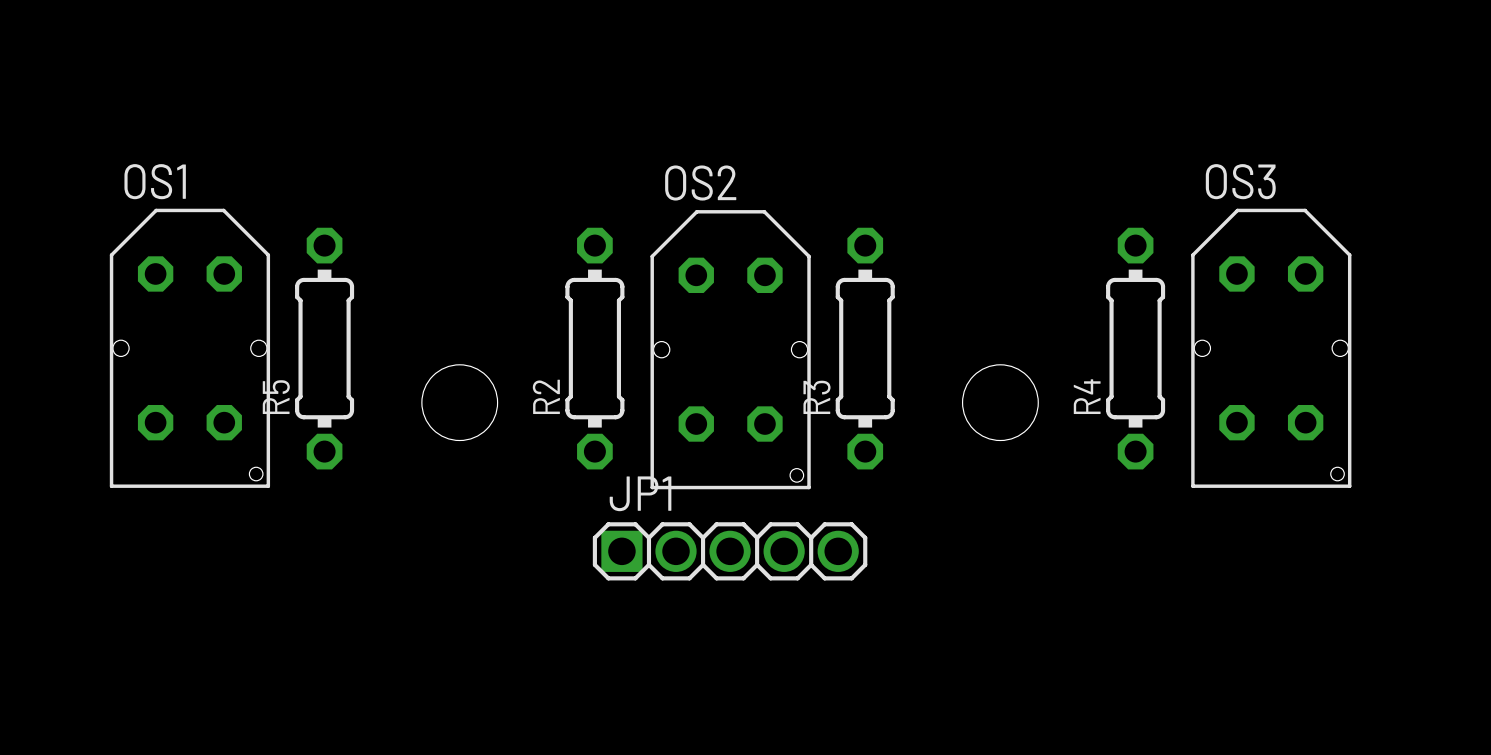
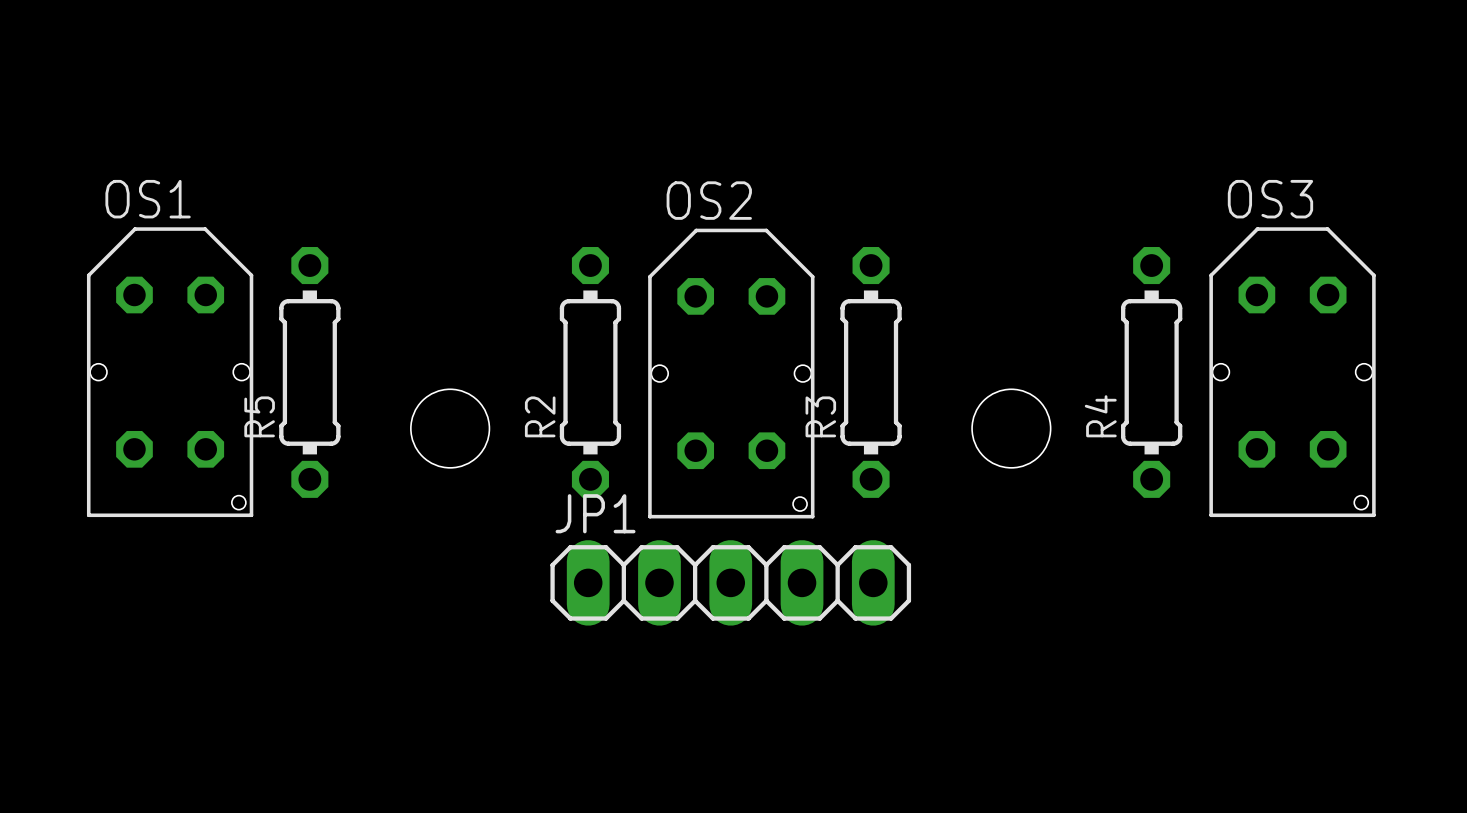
JP1 footprint: [592, 522, 868, 581] -> [550, 540, 912, 626]

